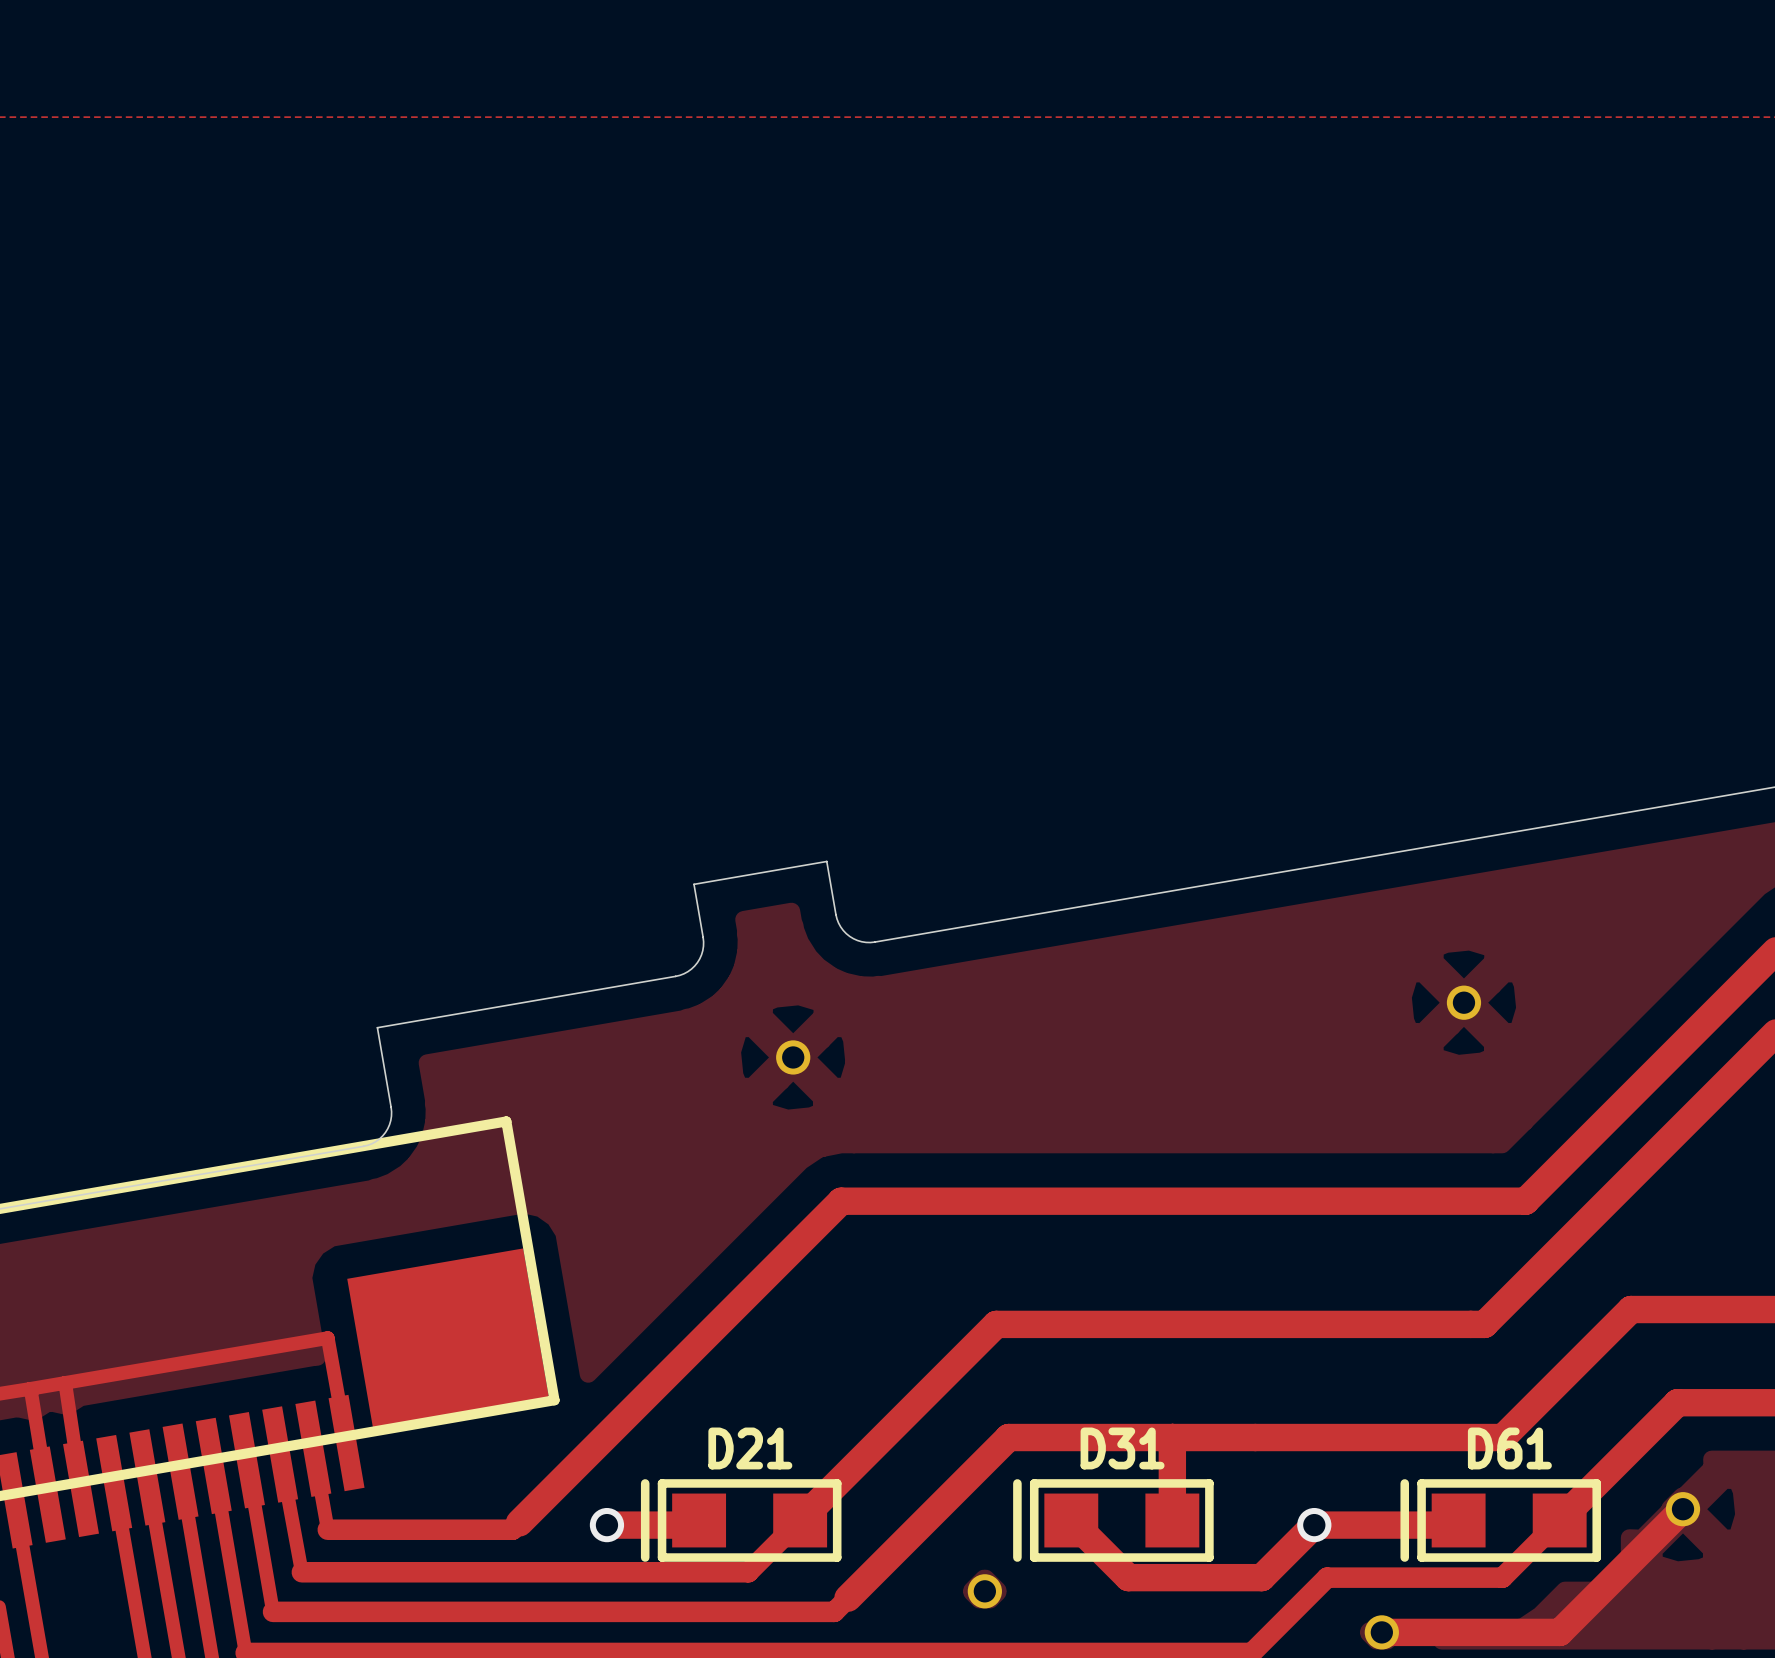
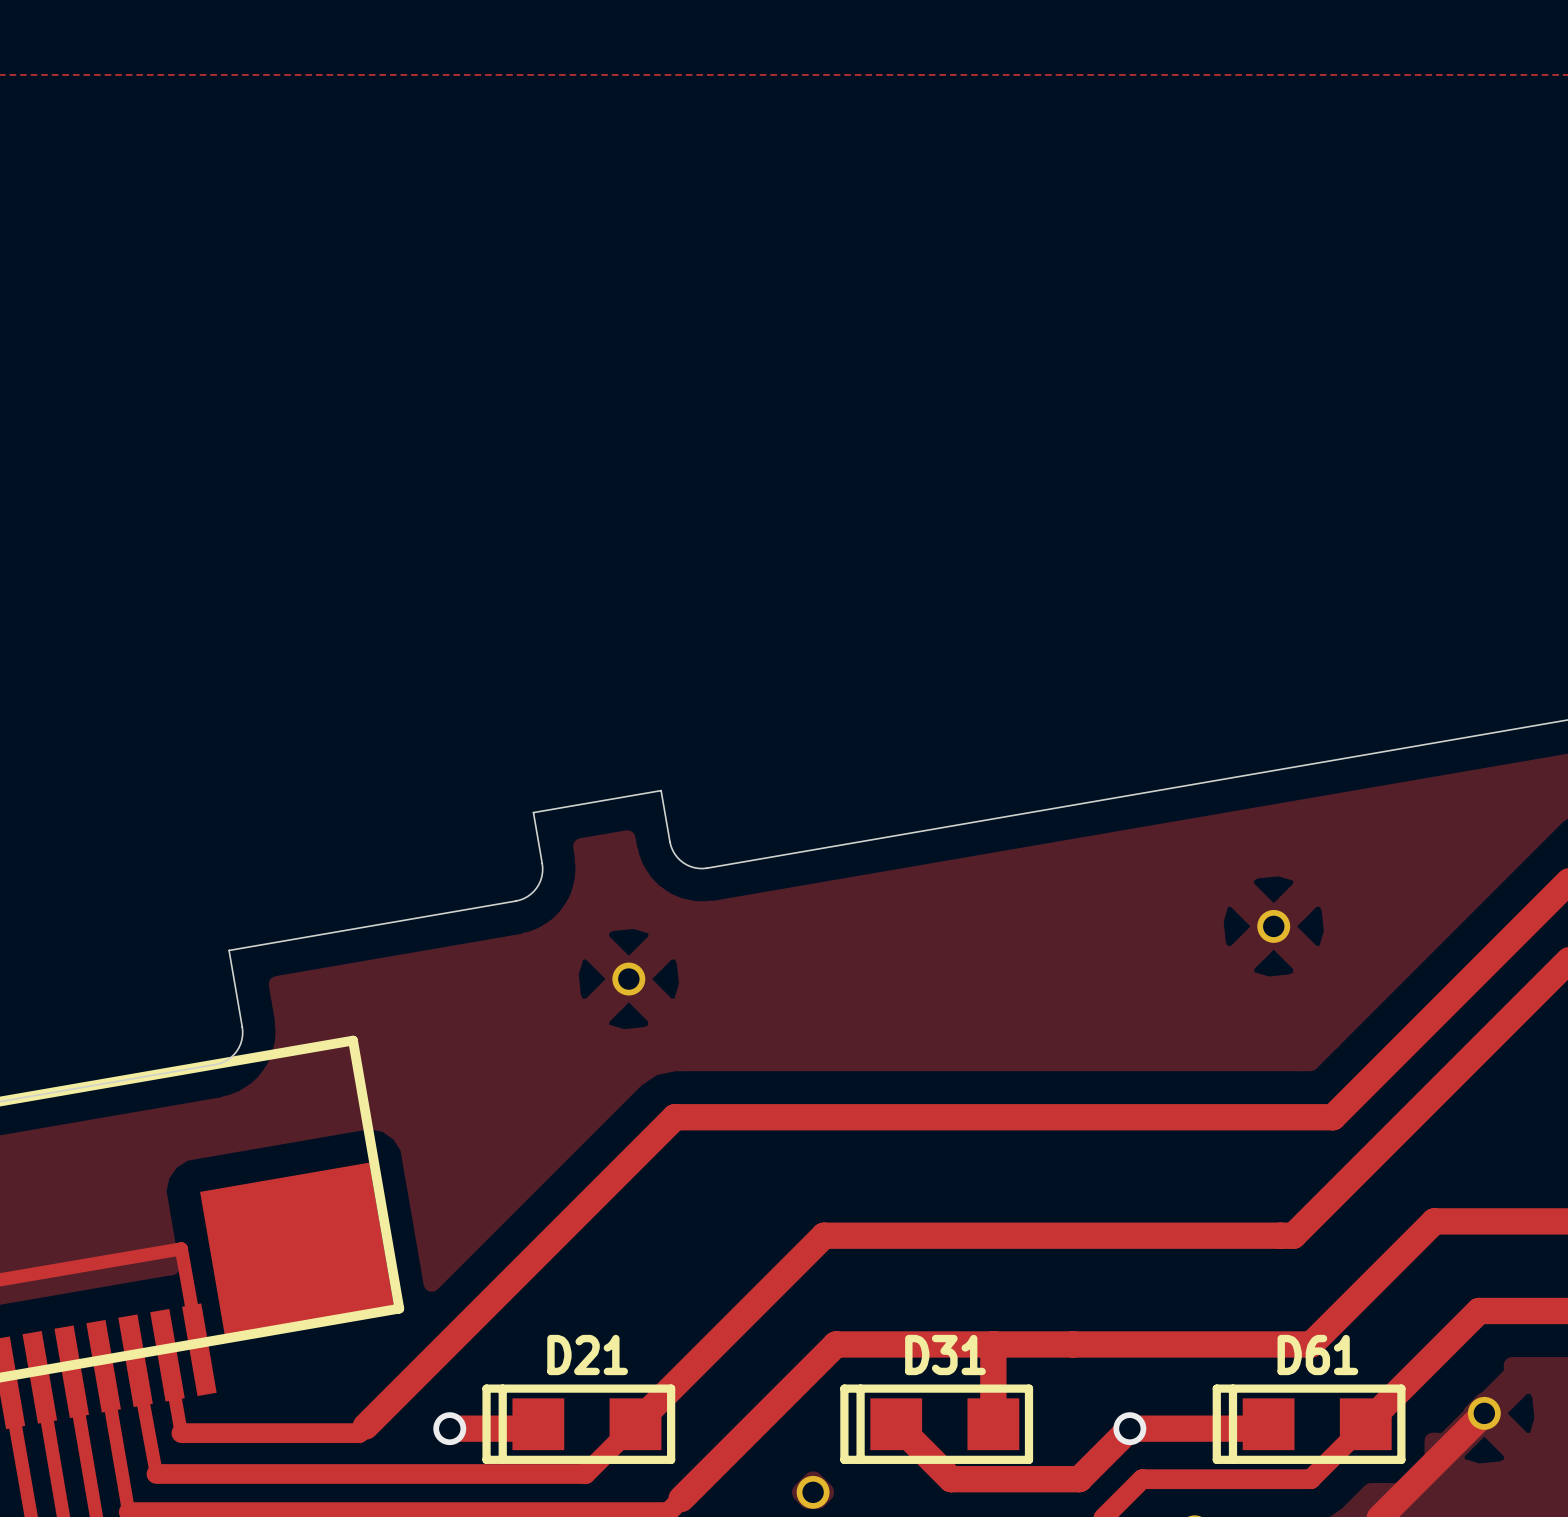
D21 footprint: [640, 1479, 842, 1562] -> [482, 1384, 676, 1464]
D31 footprint: [1013, 1479, 1214, 1562] -> [840, 1384, 1034, 1464]
D61 footprint: [1400, 1479, 1602, 1562] -> [1212, 1384, 1406, 1464]

